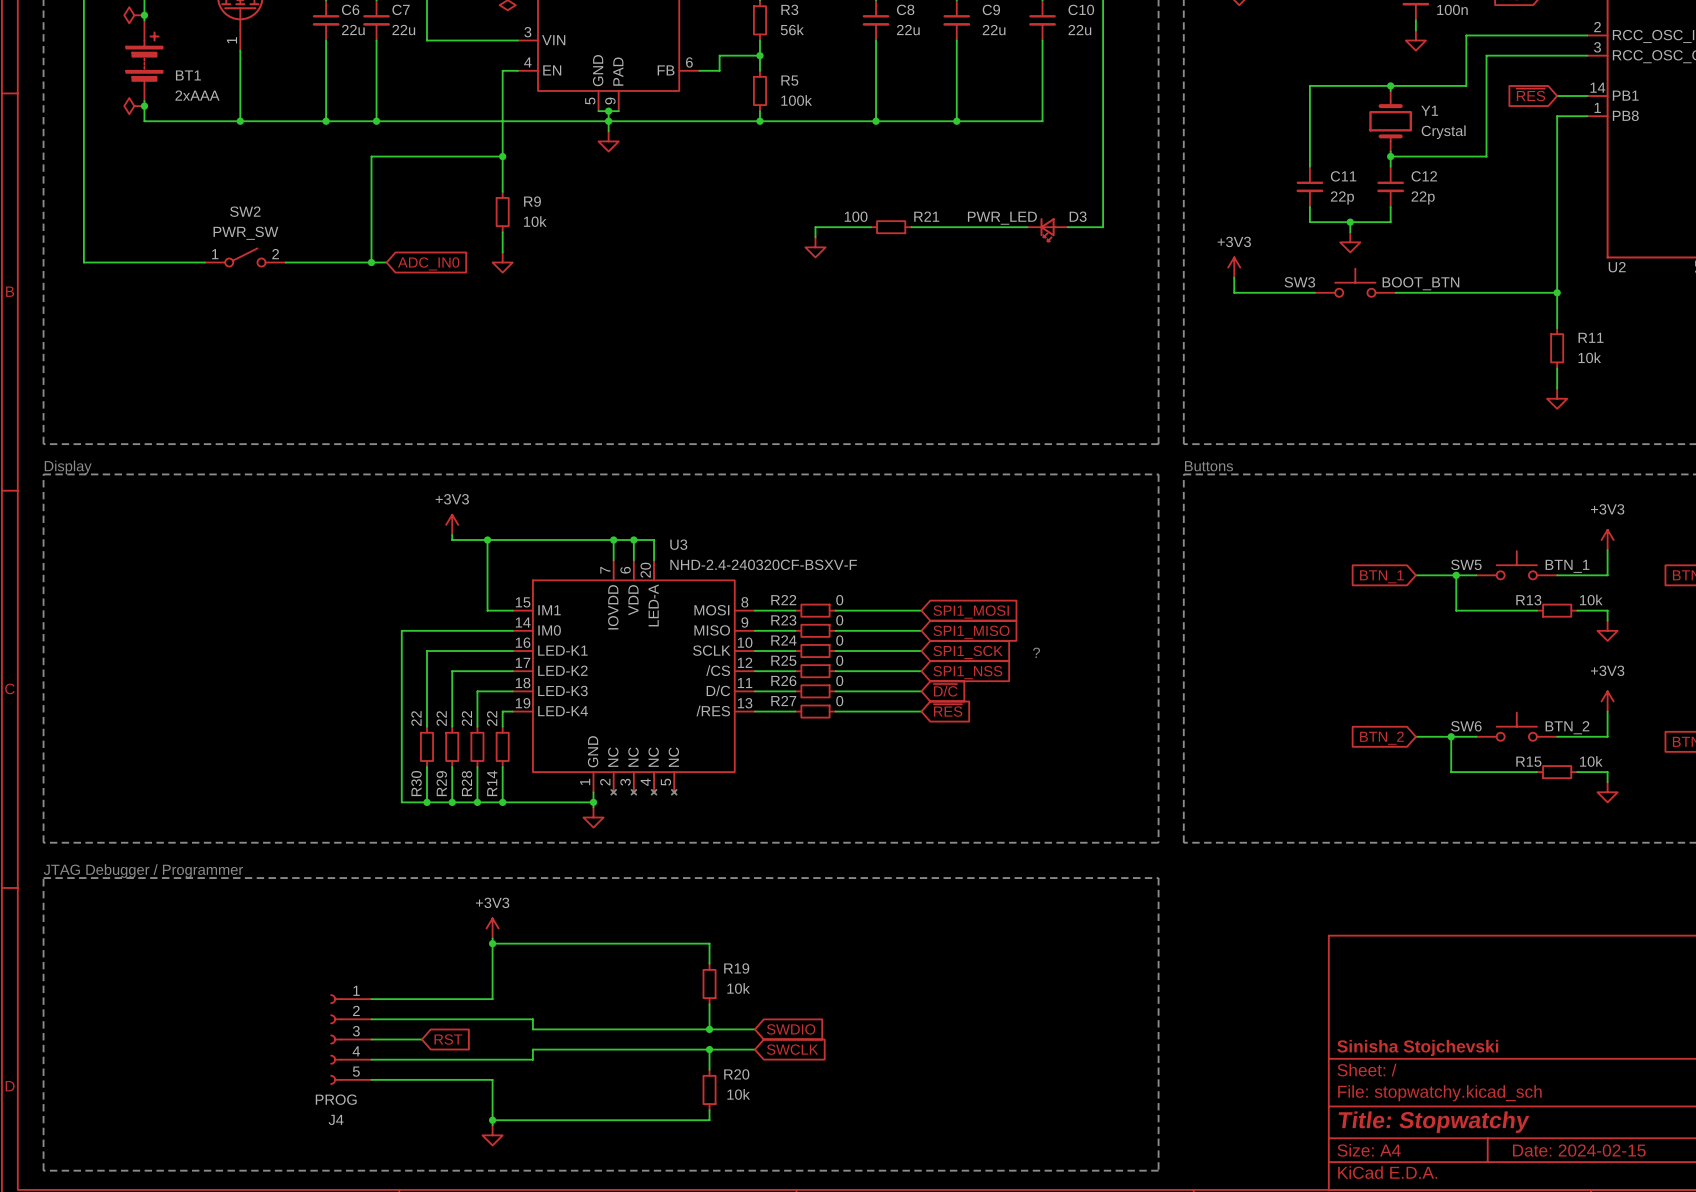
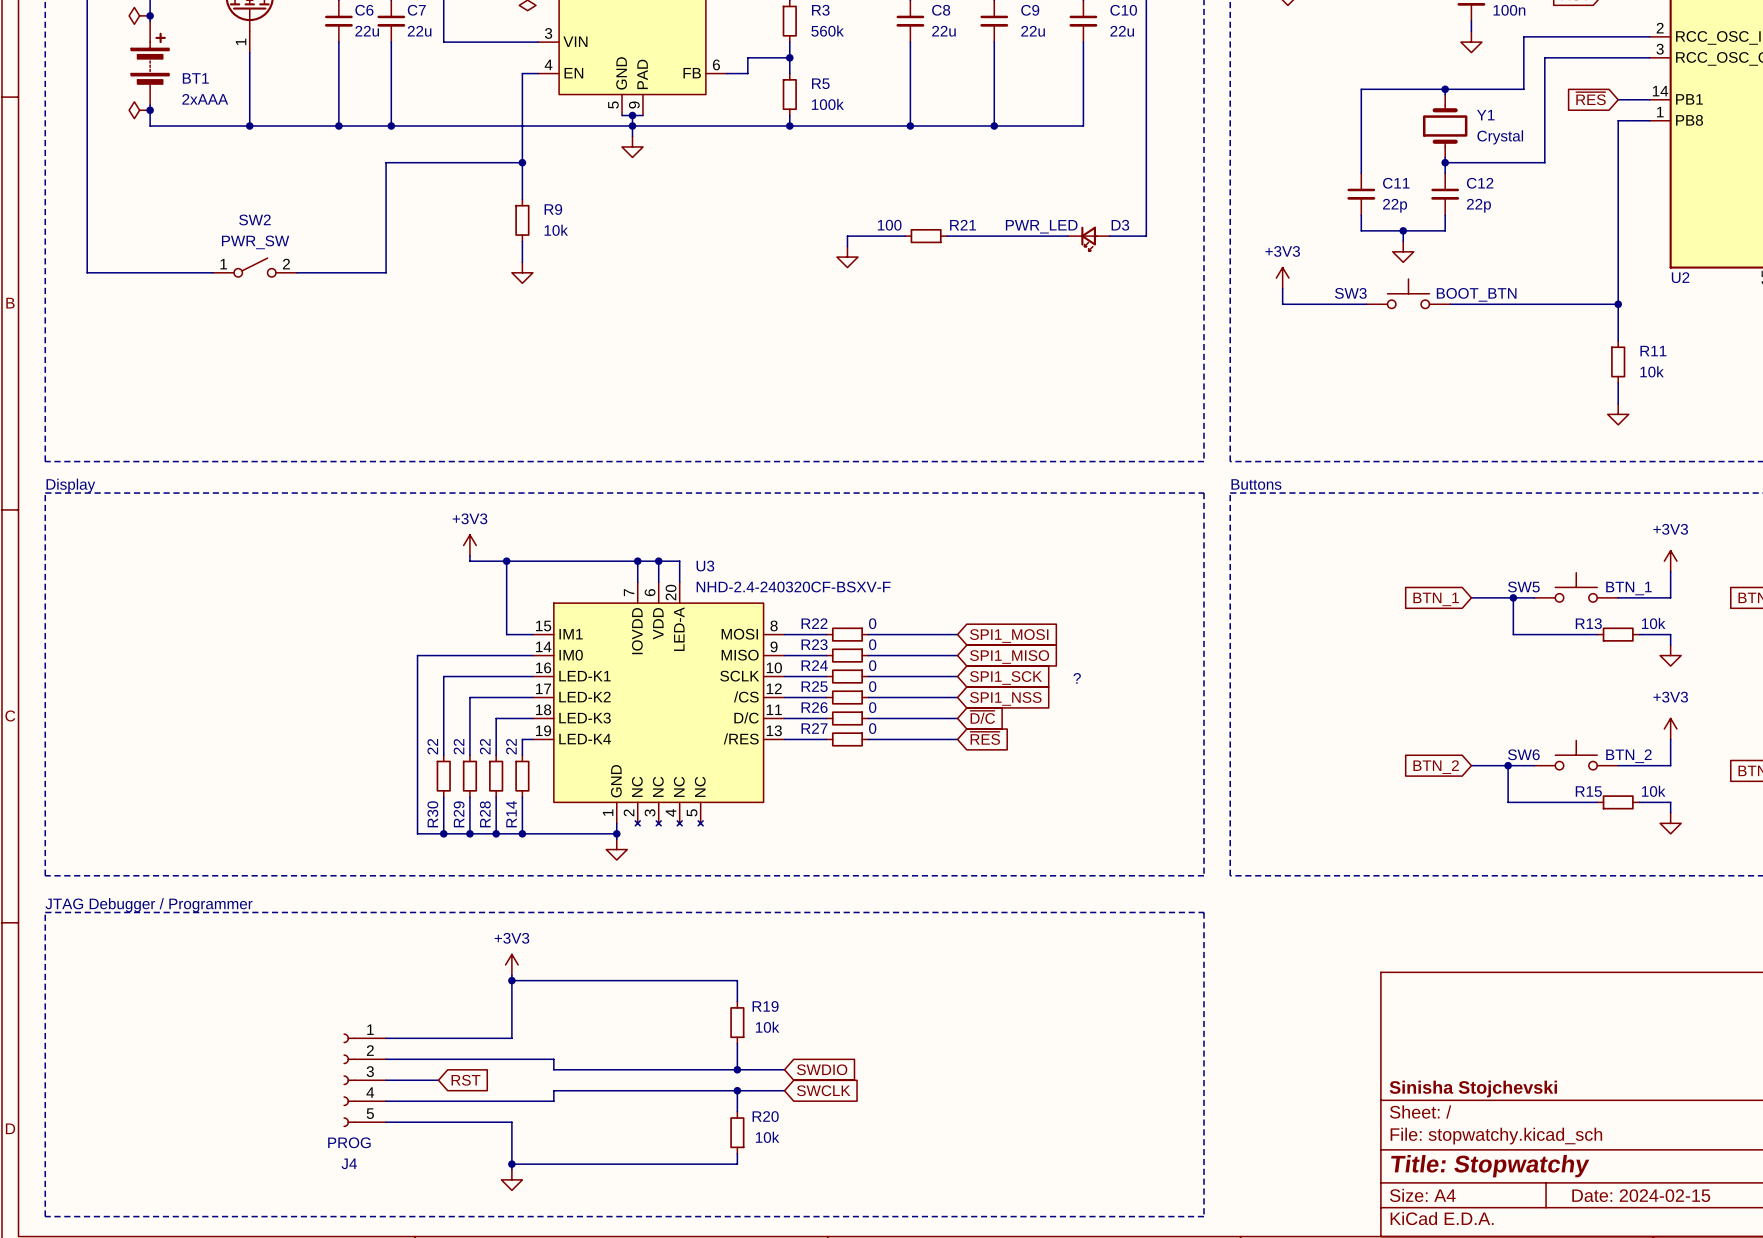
R3 value: 56k (792, 29) -> 560k (827, 31)
wire: (371, 262) (386, 262) -> none
junction: (371, 262) -> none
global label: ADC_IN0 (428, 263) -> none

